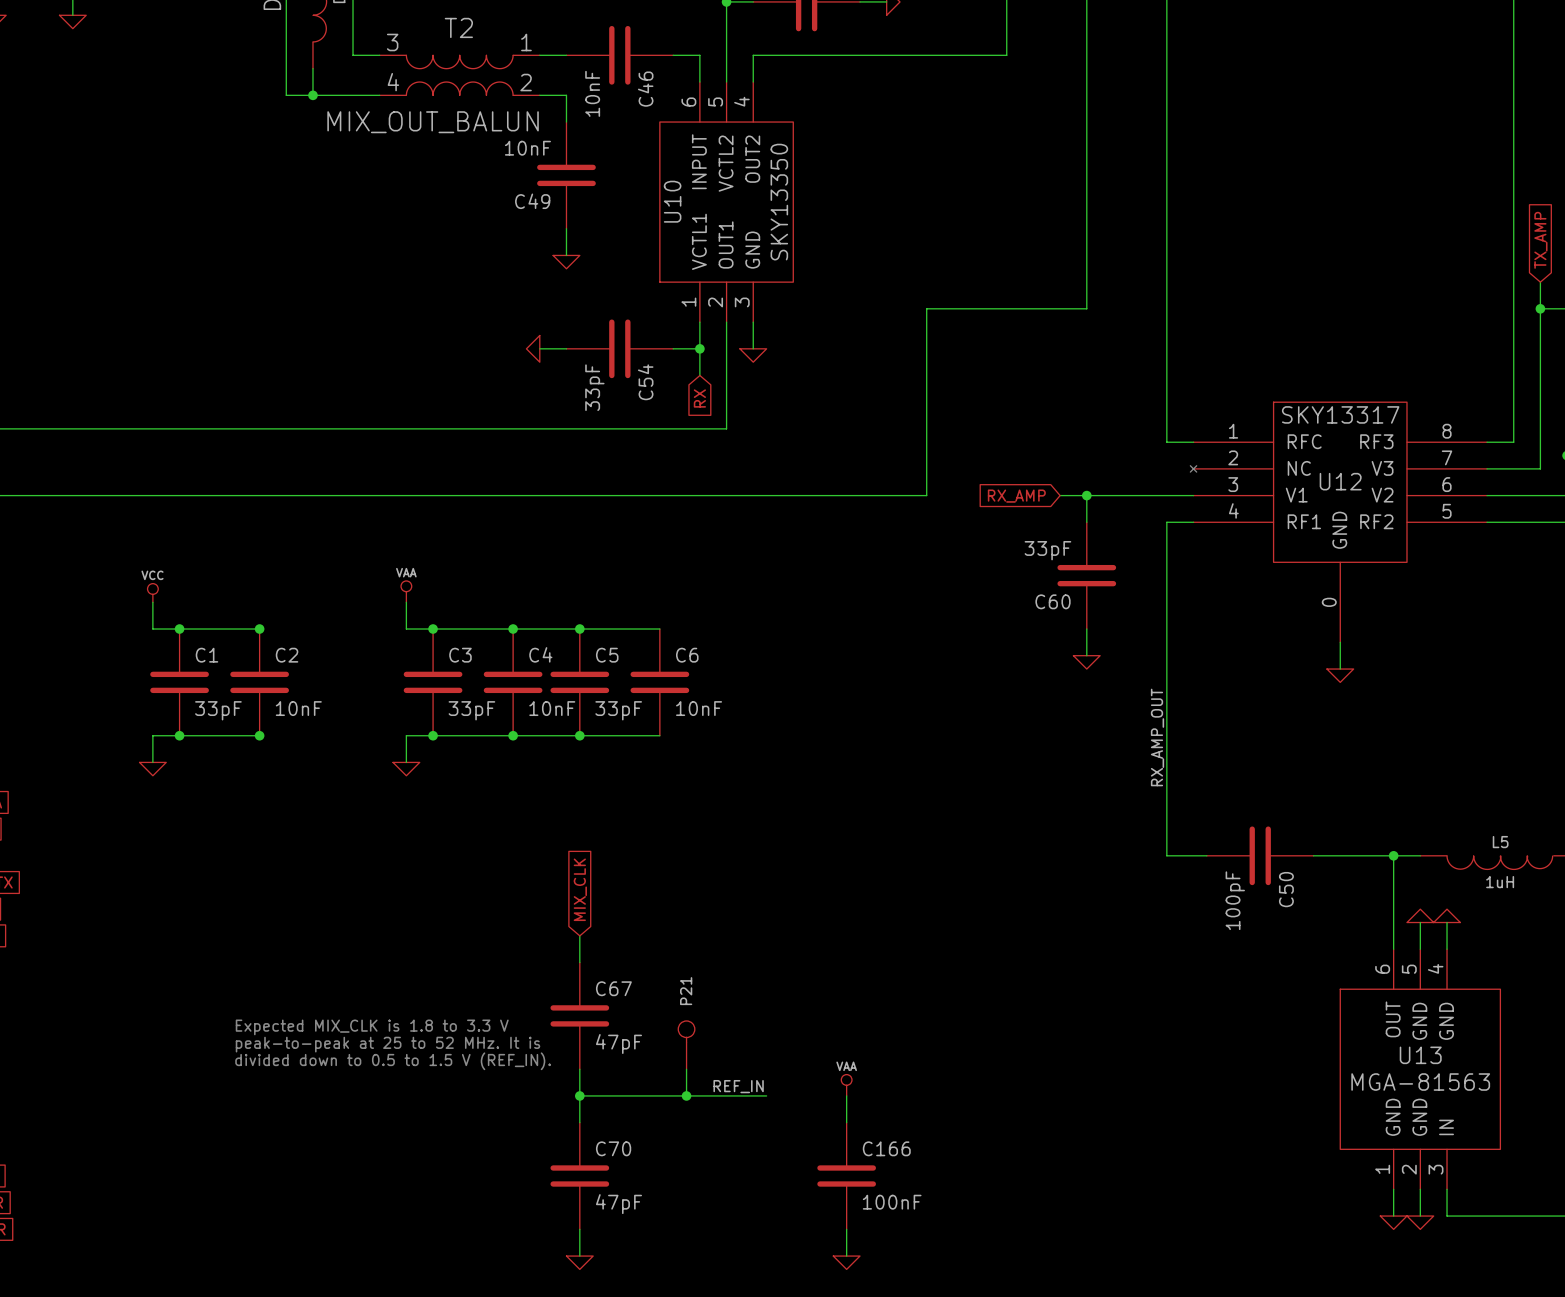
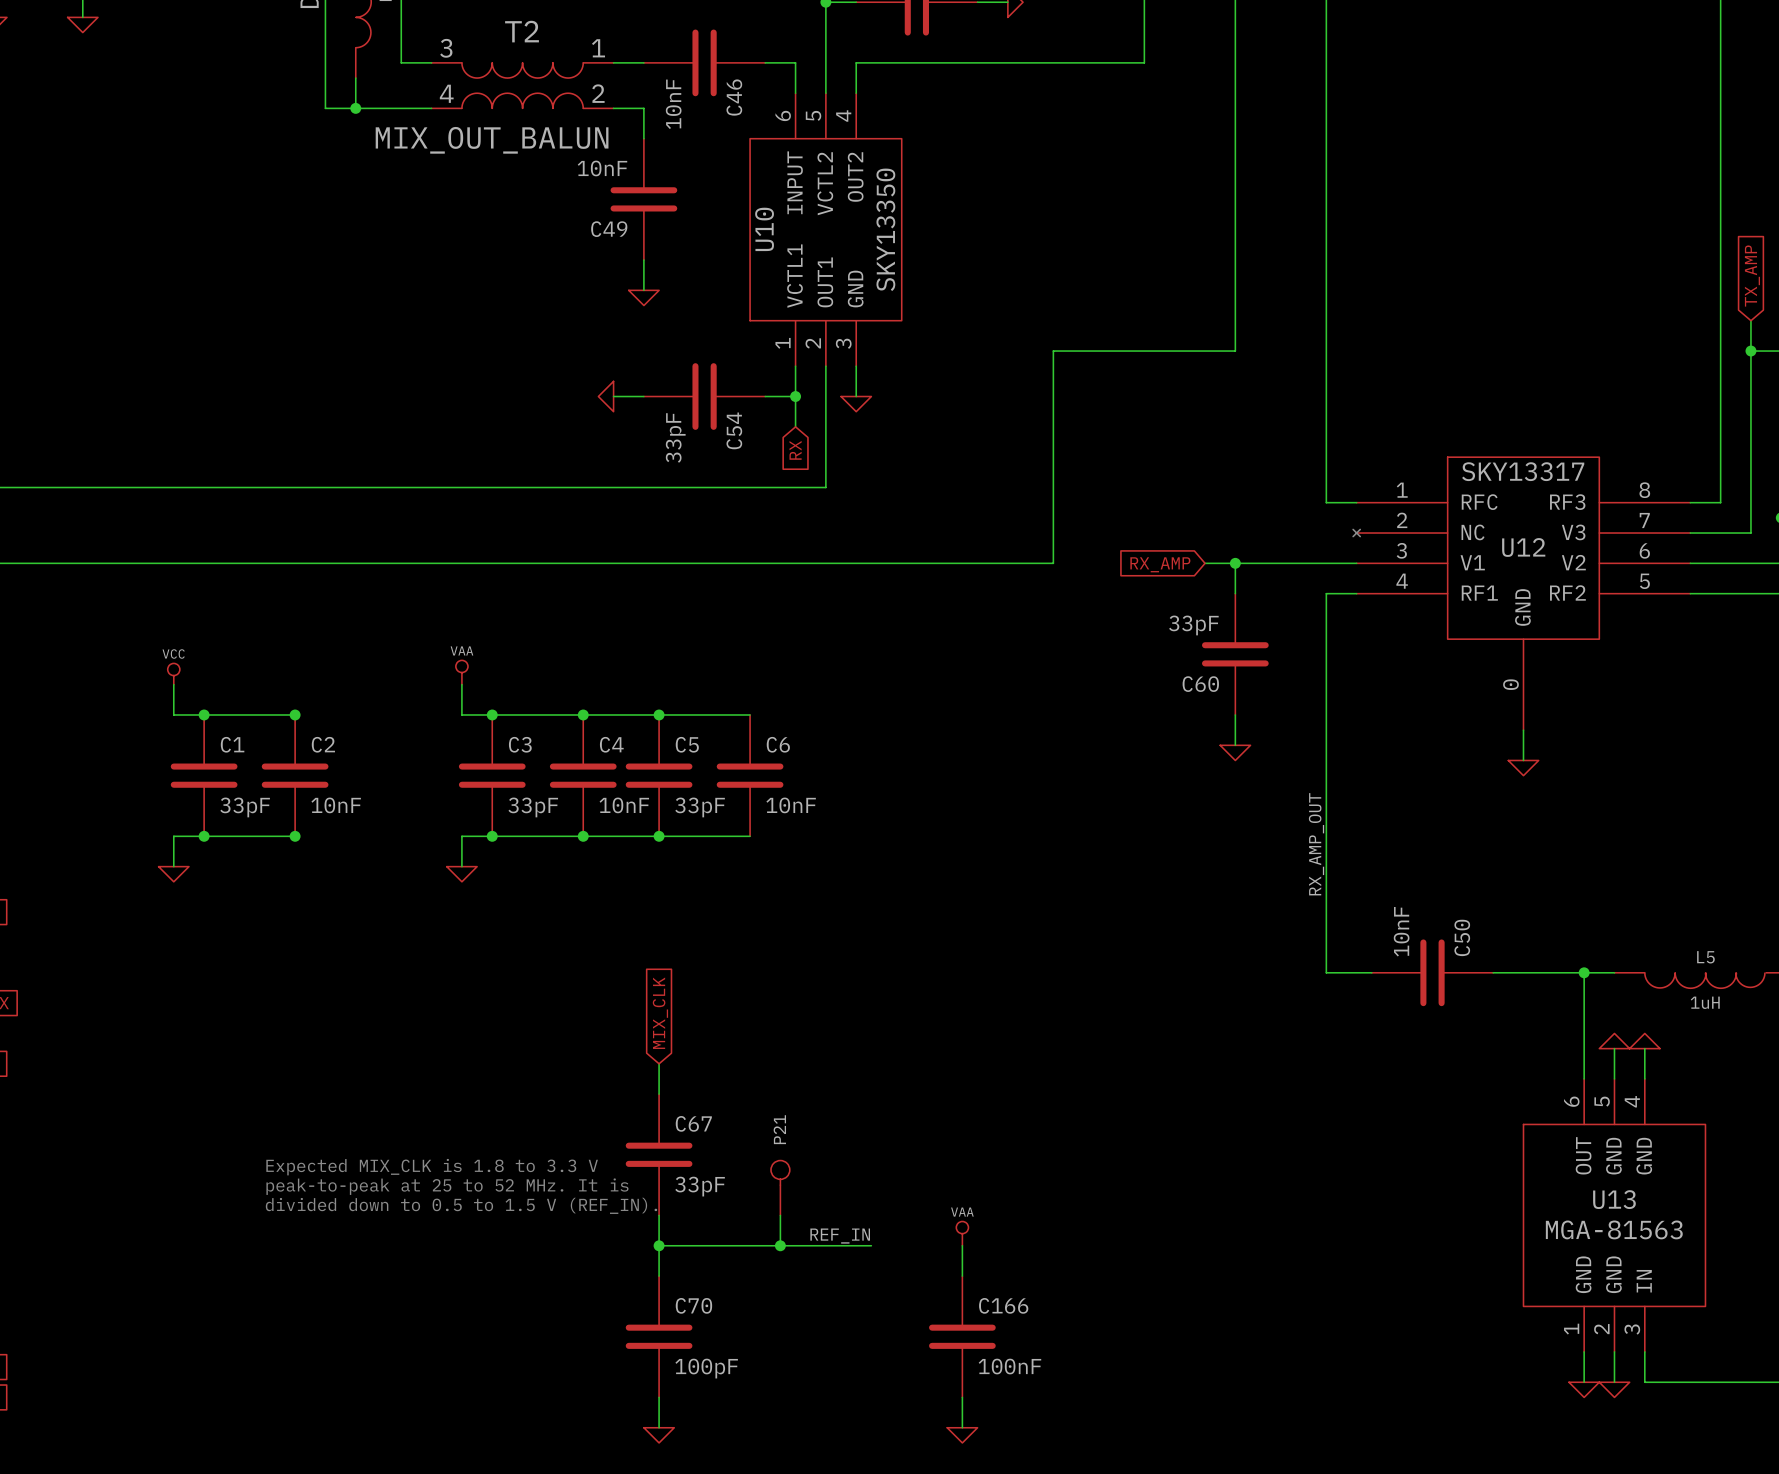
C50 name position: C50 (1286, 889) -> C50 (1462, 937)
C50 value: 100pF (1235, 900) -> 10nF (1401, 931)
C67 value: 47pF (618, 1044) -> 33pF (700, 1186)
C70 value: 47pF (618, 1204) -> 100pF (706, 1368)

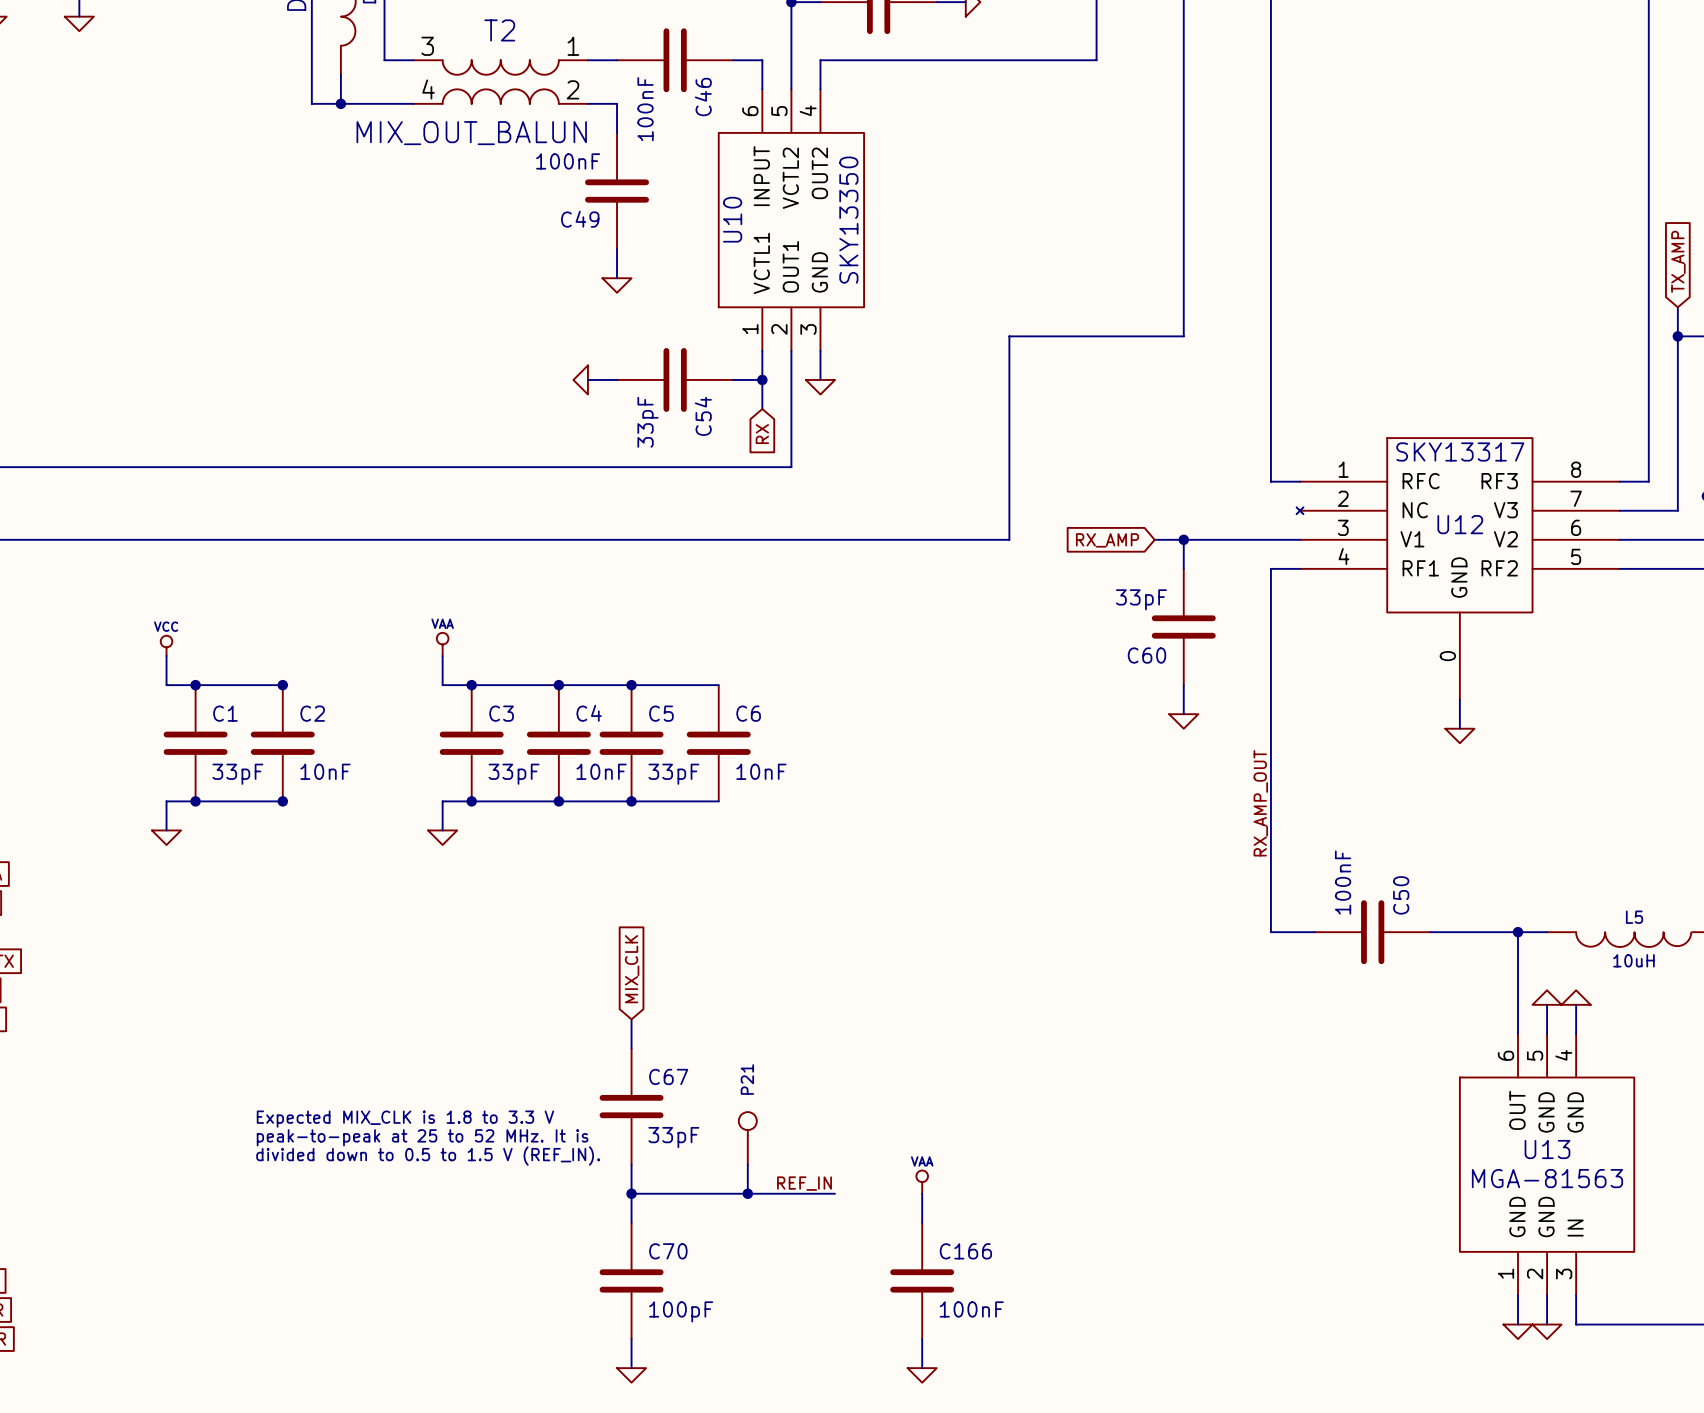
C46 value: 10nF (673, 104) -> 100nF (645, 109)
C49 value: 10nF (602, 168) -> 100nF (568, 161)
C50 value: 10nF (1401, 931) -> 100nF (1343, 882)
L5 value: 1uH (1705, 1002) -> 10uH (1633, 960)

